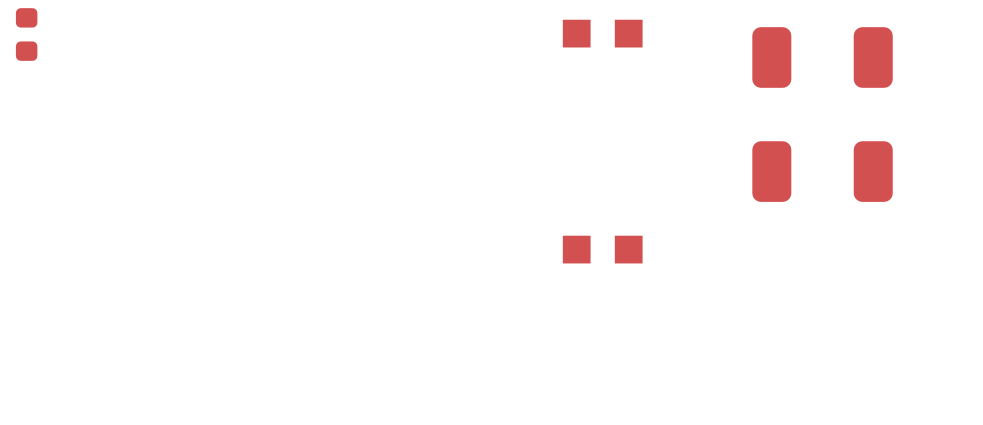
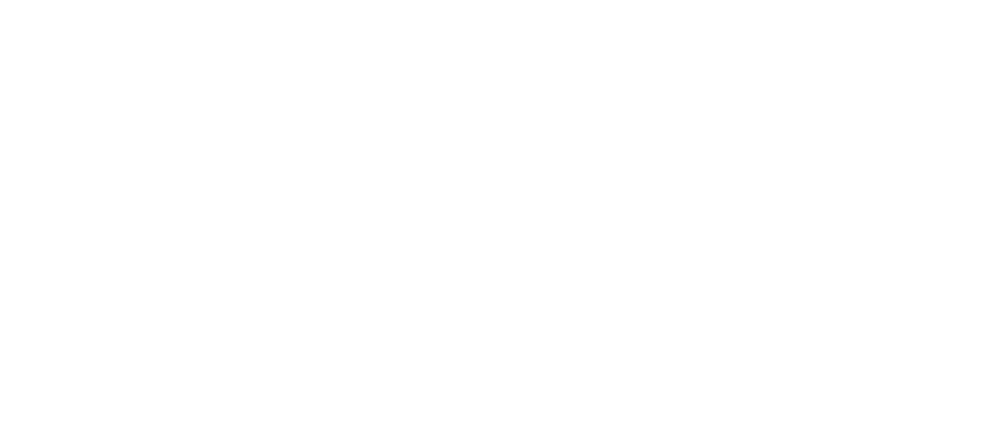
part: (602, 33) -> none
part: (26, 34) -> none
part: (822, 57) -> none
part: (822, 171) -> none
part: (602, 249) -> none

